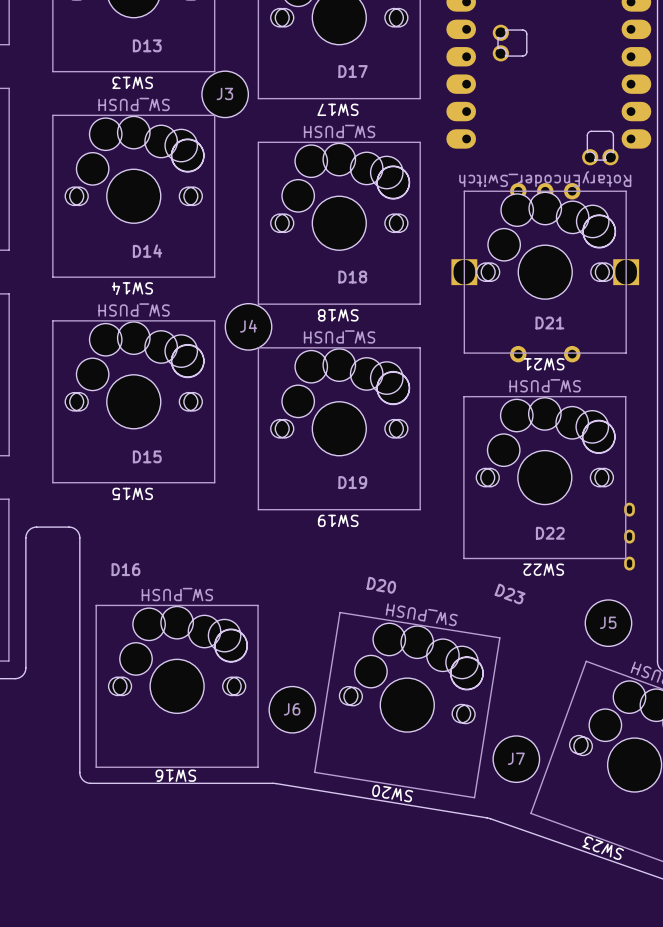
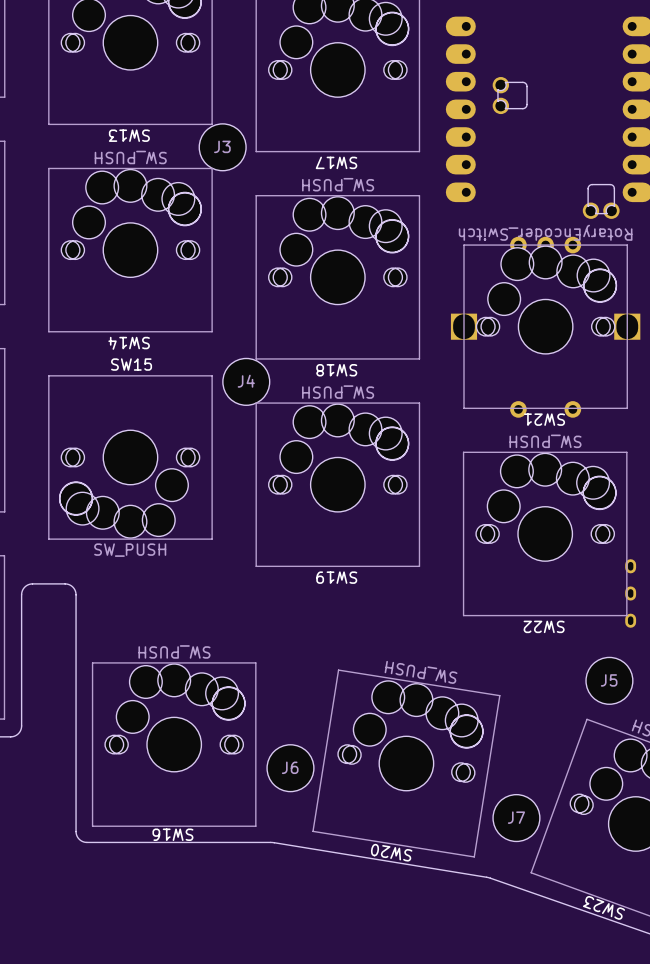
D13: (147, 45) -> none
D17: (353, 71) -> none
D14: (147, 251) -> none
D18: (352, 277) -> none
D21: (549, 323) -> none
SW15 rotation: 0° (133, 401) -> 180° (130, 457)
D15: (147, 456) -> none
D19: (352, 482) -> none
D22: (550, 533) -> none
D16: (125, 569) -> none
D20: (381, 585) -> none
D23: (510, 593) -> none

